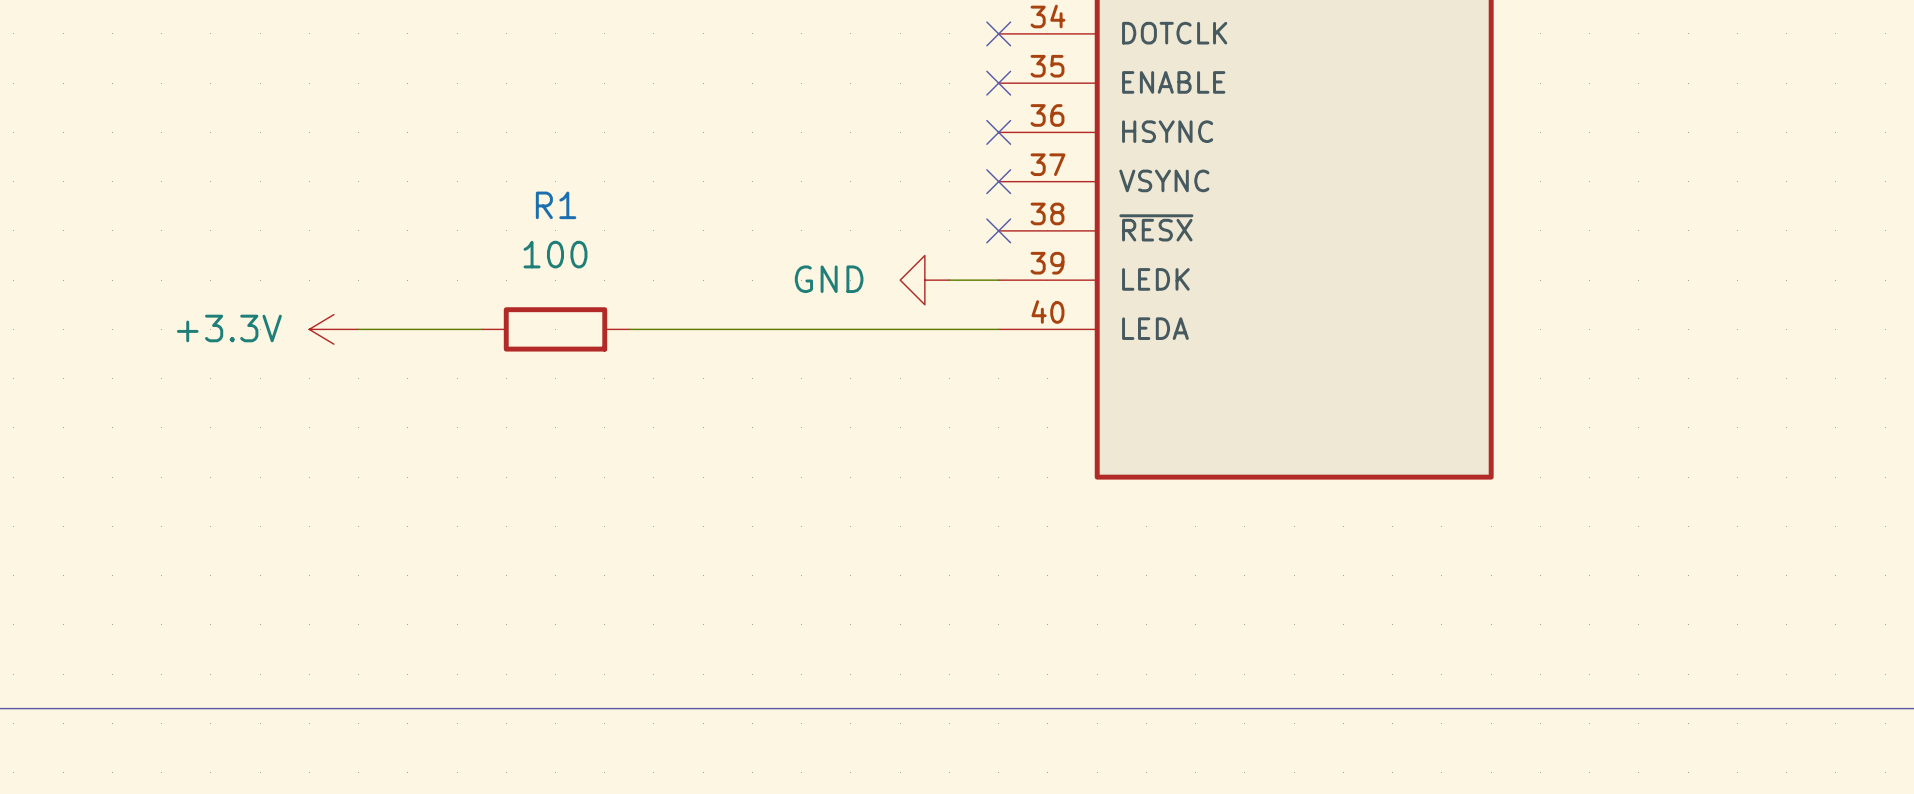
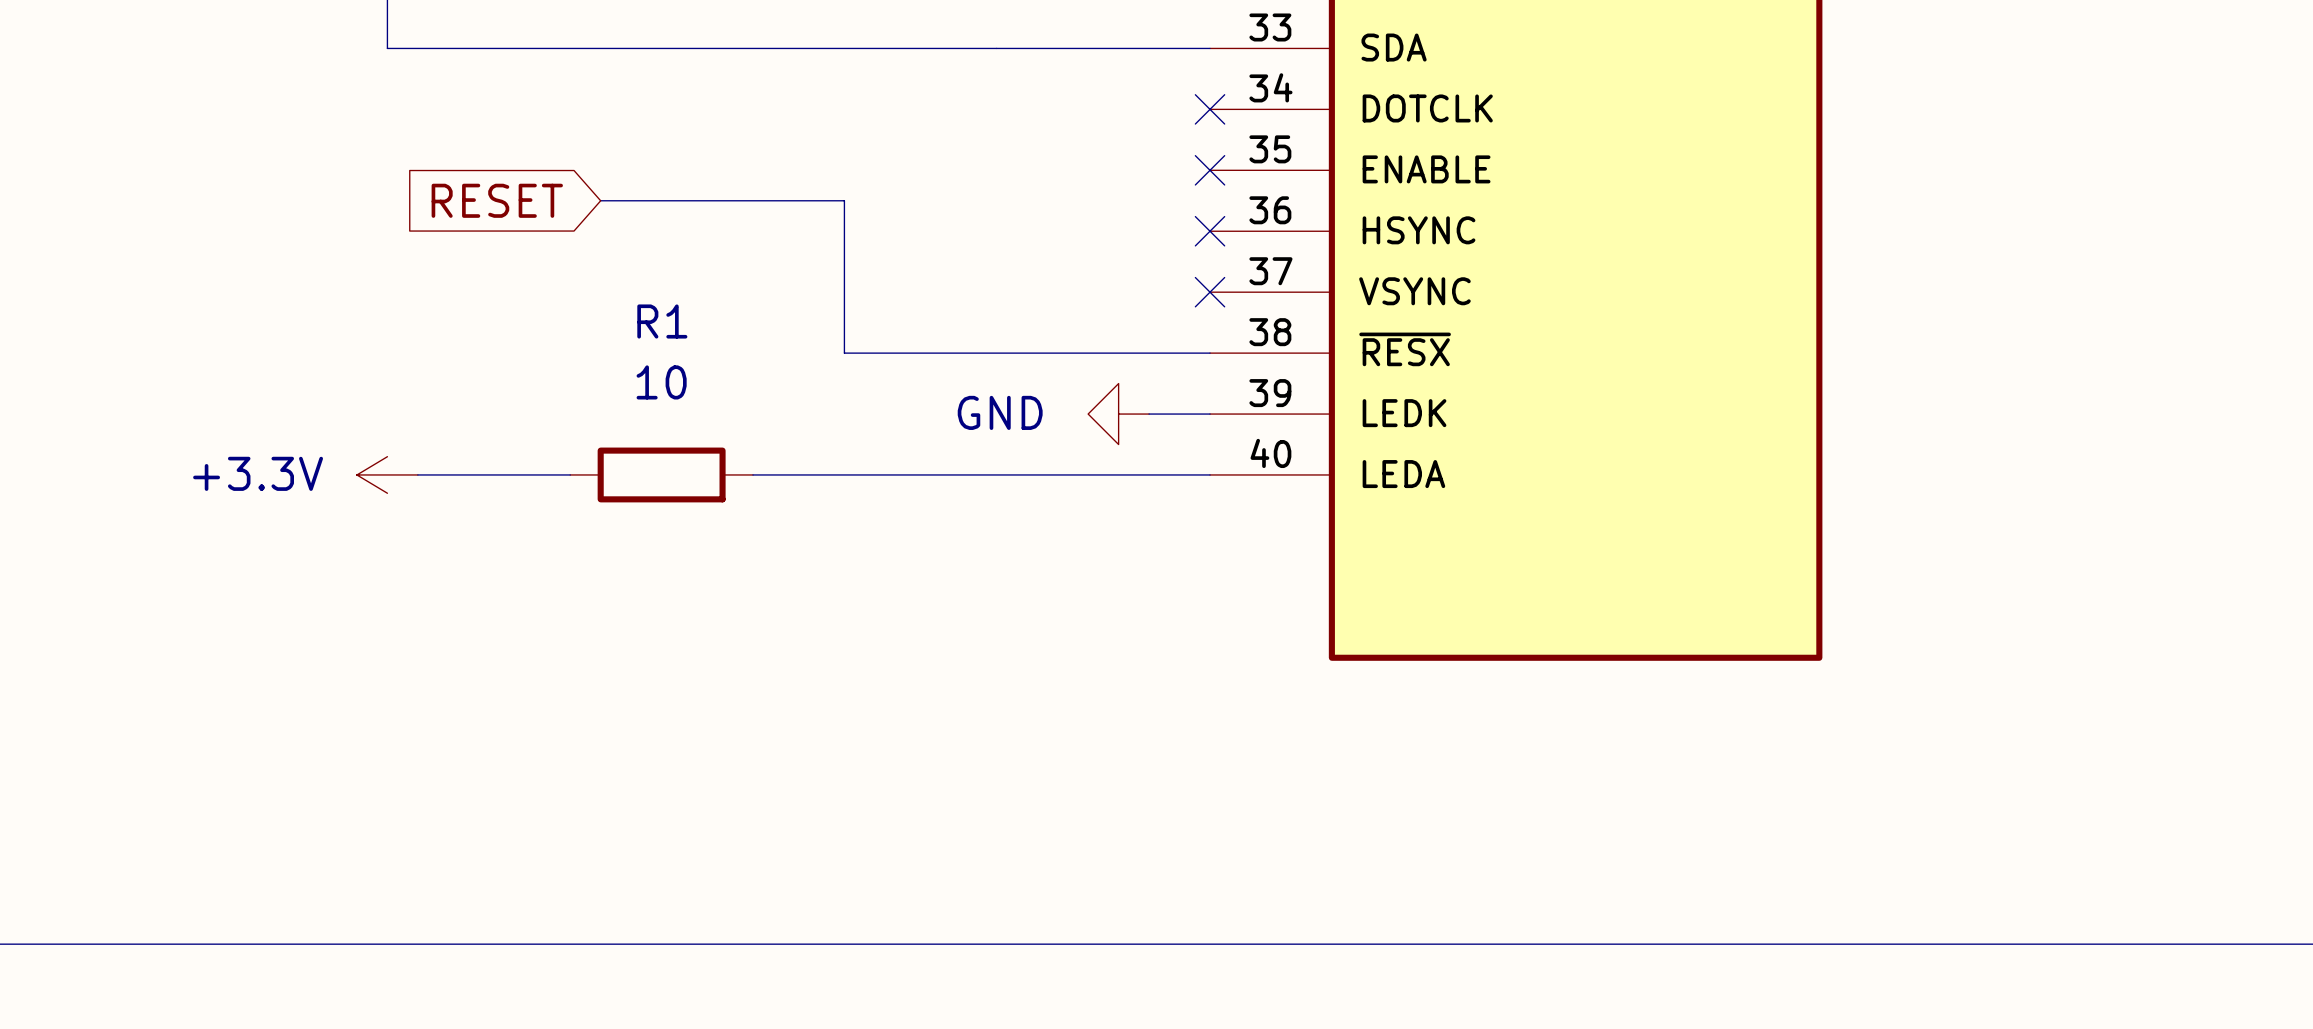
global label: none -> RESET (497, 200)
wire: none -> (600, 200) (844, 200) (844, 353) (1210, 353)
no-connect mark: (998, 230) -> none
R1 value: 100 (555, 254) -> 10 (661, 382)

